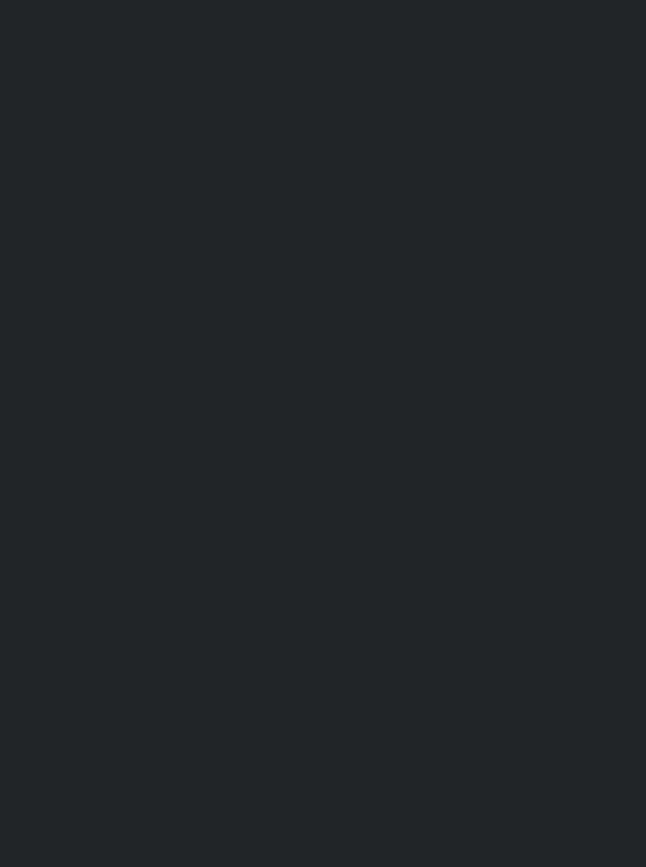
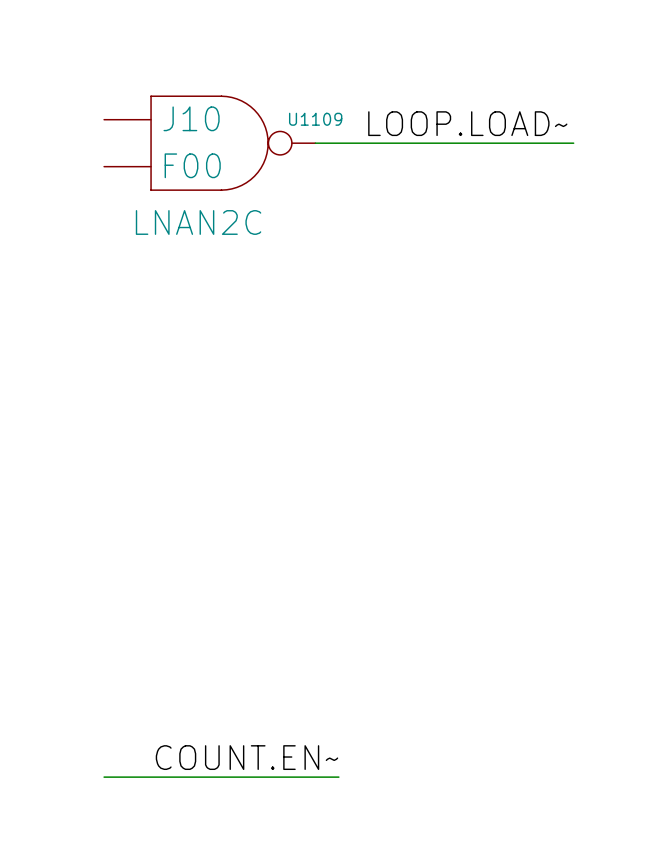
label: none -> LOOP.LOAD~ (467, 123)
U1109: none -> F00 (209, 143)
wire: none -> (315, 143) (573, 143)
label: none -> COUNT.EN~ (247, 757)
wire: none -> (104, 777) (338, 777)

